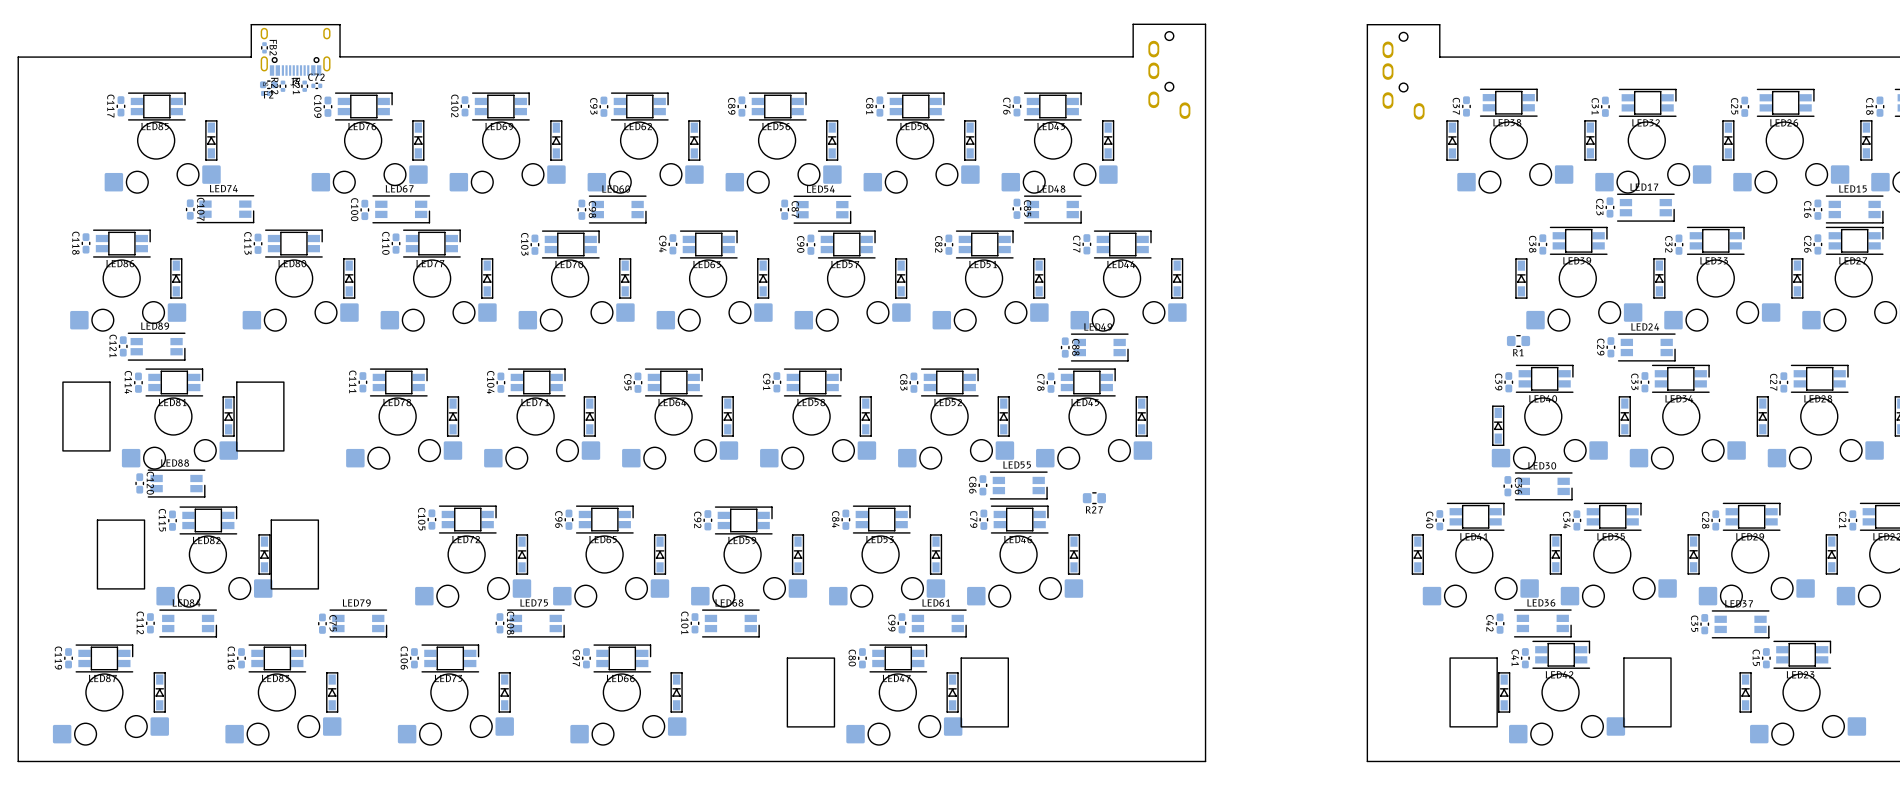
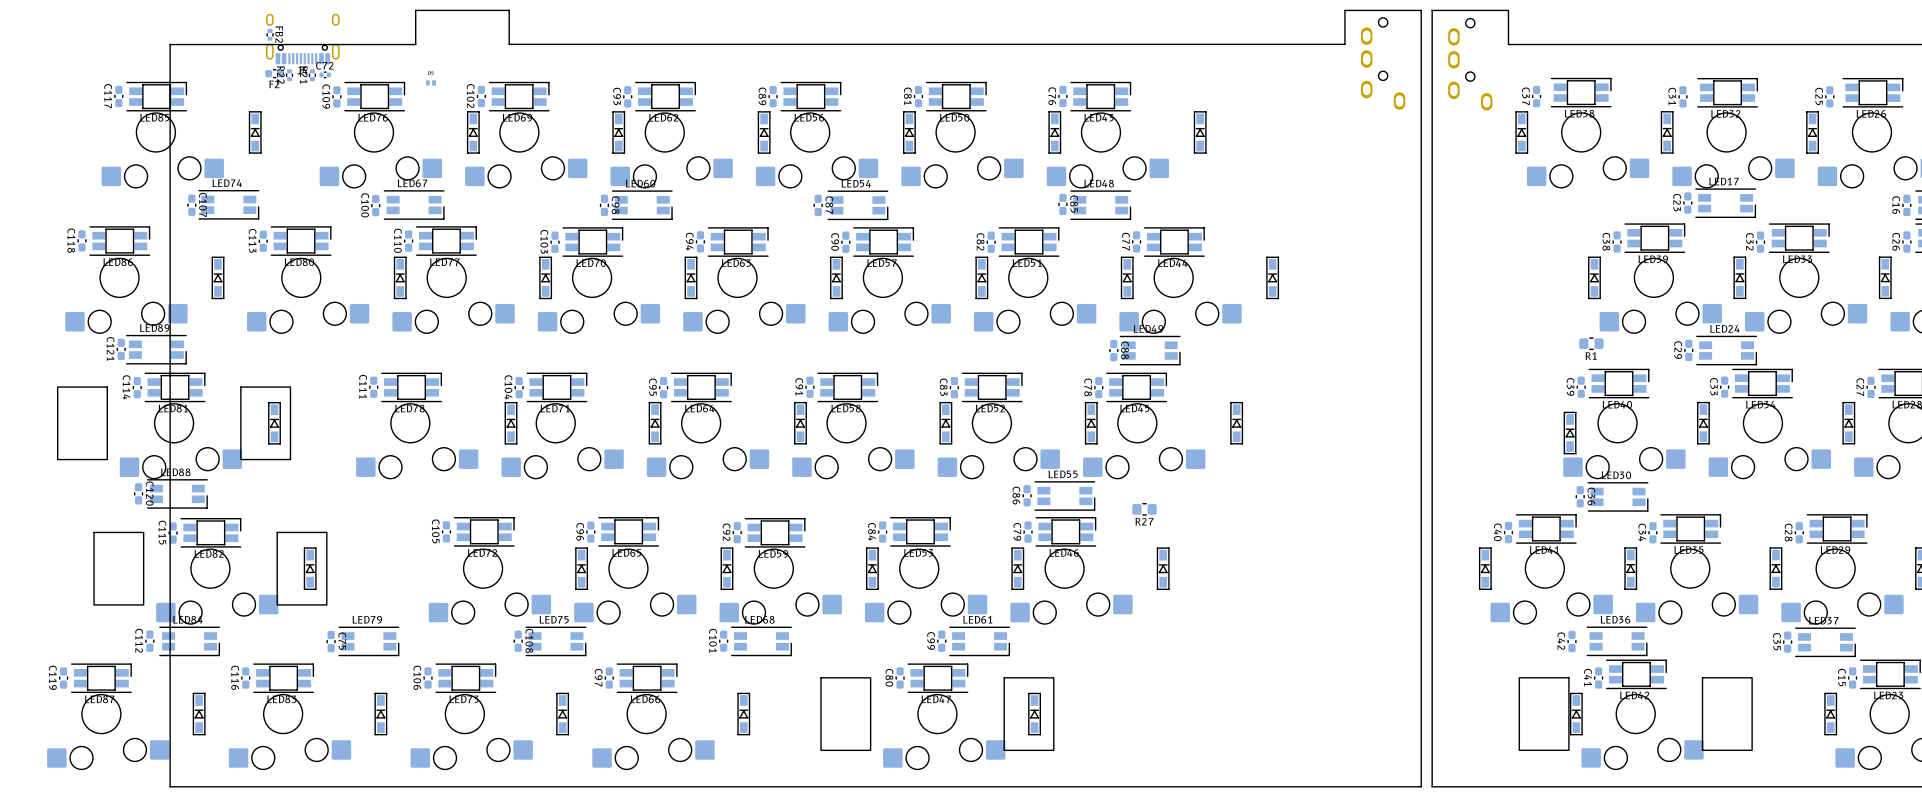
board edge: (491, 56) (340, 56) (340, 24) (251, 24) (251, 57) -> (509, 44) (509, 10) (415, 10) (415, 44) (256, 44)
board edge: (1133, 56) (1133, 24) (1205, 24) (1205, 761) -> (1185, 44) (1344, 44) (1344, 10) (1421, 10) (1421, 786) (1261, 786)
board edge: (169, 57) (18, 57) (18, 761) (169, 761) -> (170, 44) (170, 786)
part position: (1169, 75) -> (1383, 63)
part position: (265, 93) -> (430, 82)
part position: (211, 140) -> (255, 132)
part position: (418, 140) -> (473, 132)
part position: (556, 140) -> (618, 132)
part position: (694, 140) -> (764, 132)
part position: (832, 140) -> (909, 132)
part position: (970, 140) -> (1054, 132)
part position: (1108, 140) -> (1200, 132)
part position: (176, 278) -> (218, 277)
part position: (349, 278) -> (400, 277)
part position: (487, 278) -> (545, 277)
part position: (625, 278) -> (691, 277)
part position: (763, 278) -> (836, 277)
part position: (901, 278) -> (981, 277)
part position: (1039, 278) -> (1127, 277)
part position: (1177, 278) -> (1272, 277)
part position: (228, 416) -> (274, 423)
part position: (453, 416) -> (511, 423)
part position: (589, 416) -> (655, 423)
part position: (727, 416) -> (800, 423)
part position: (865, 416) -> (945, 423)
part position: (1003, 416) -> (1091, 423)
part position: (1141, 416) -> (1236, 423)
part position: (264, 554) -> (310, 568)
part position: (522, 554) -> (581, 568)
part position: (660, 554) -> (726, 568)
part position: (798, 554) -> (872, 568)
part position: (936, 554) -> (1017, 568)
part position: (1073, 554) -> (1163, 568)
part position: (159, 692) -> (199, 714)
part position: (332, 692) -> (380, 714)
part position: (504, 692) -> (562, 714)
part position: (676, 692) -> (743, 714)
part position: (952, 692) -> (1034, 714)

